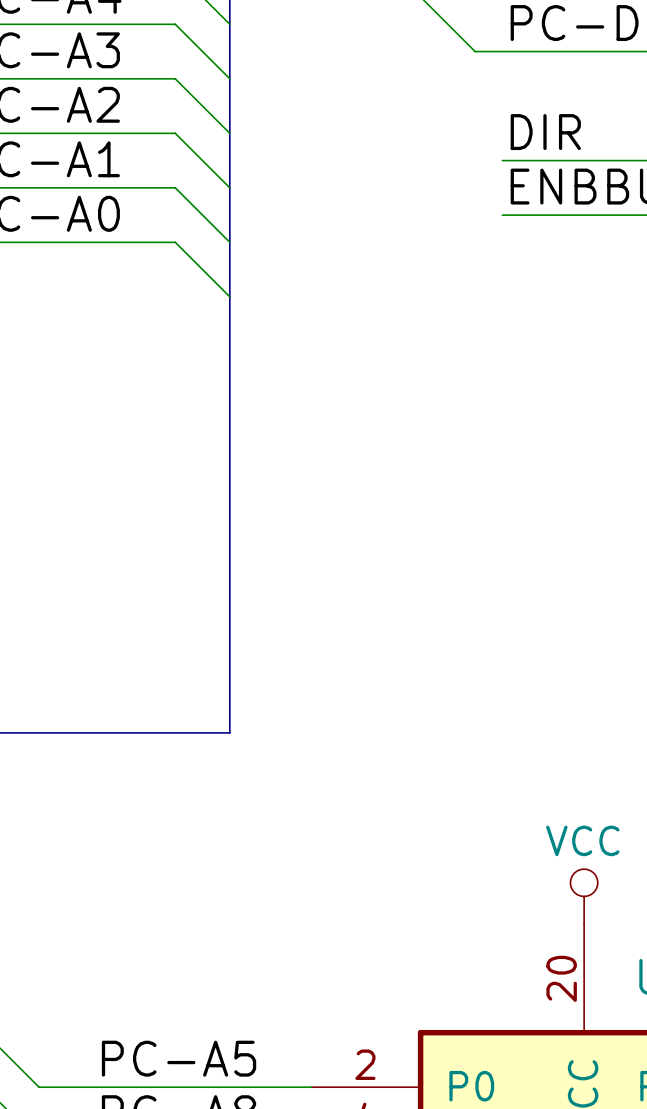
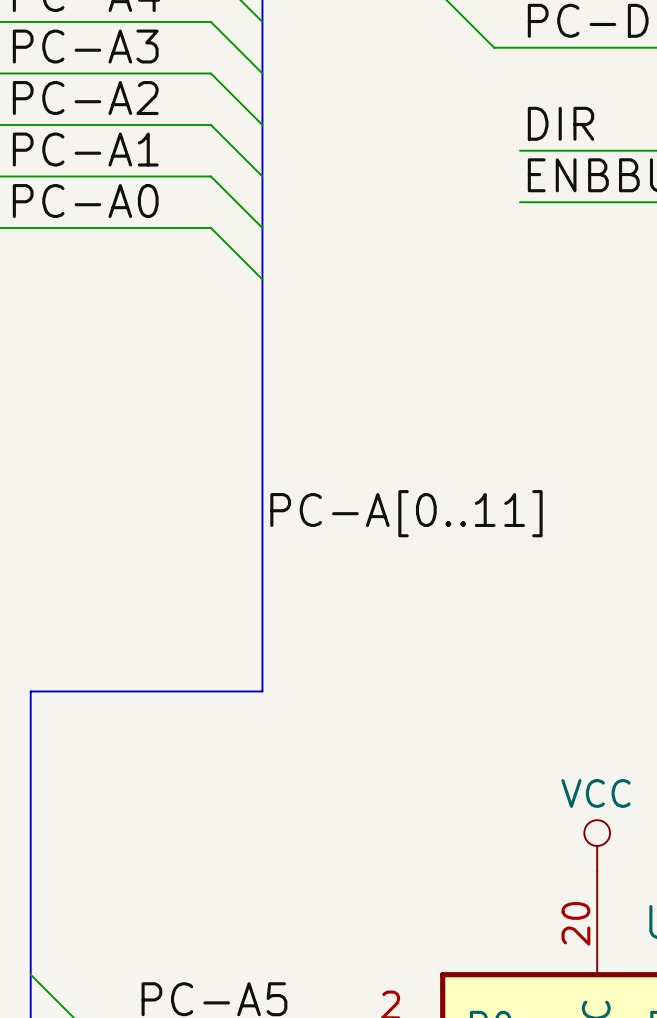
label: none -> PC-A[0..11] (406, 513)

